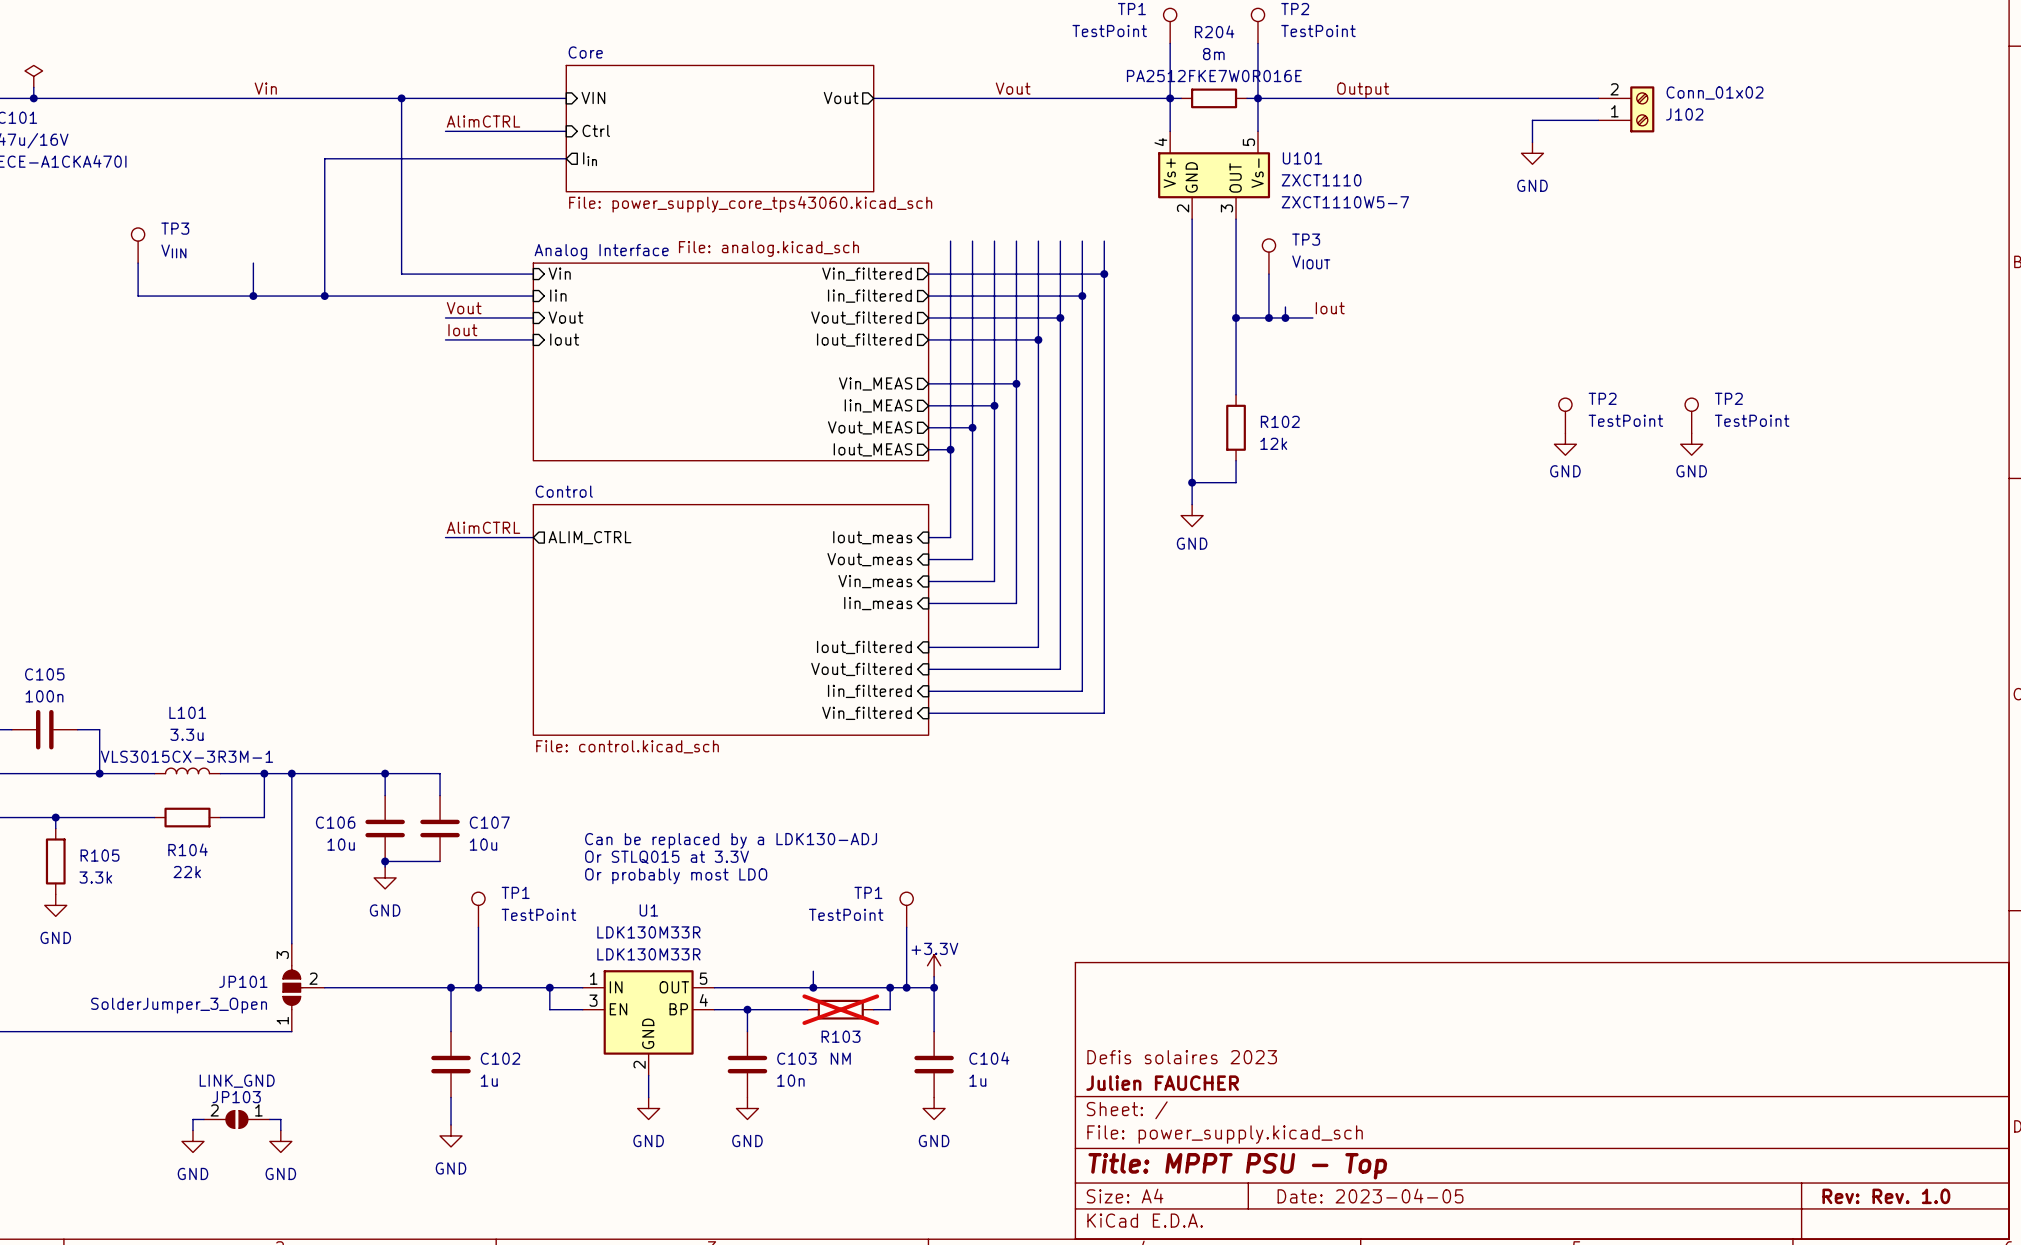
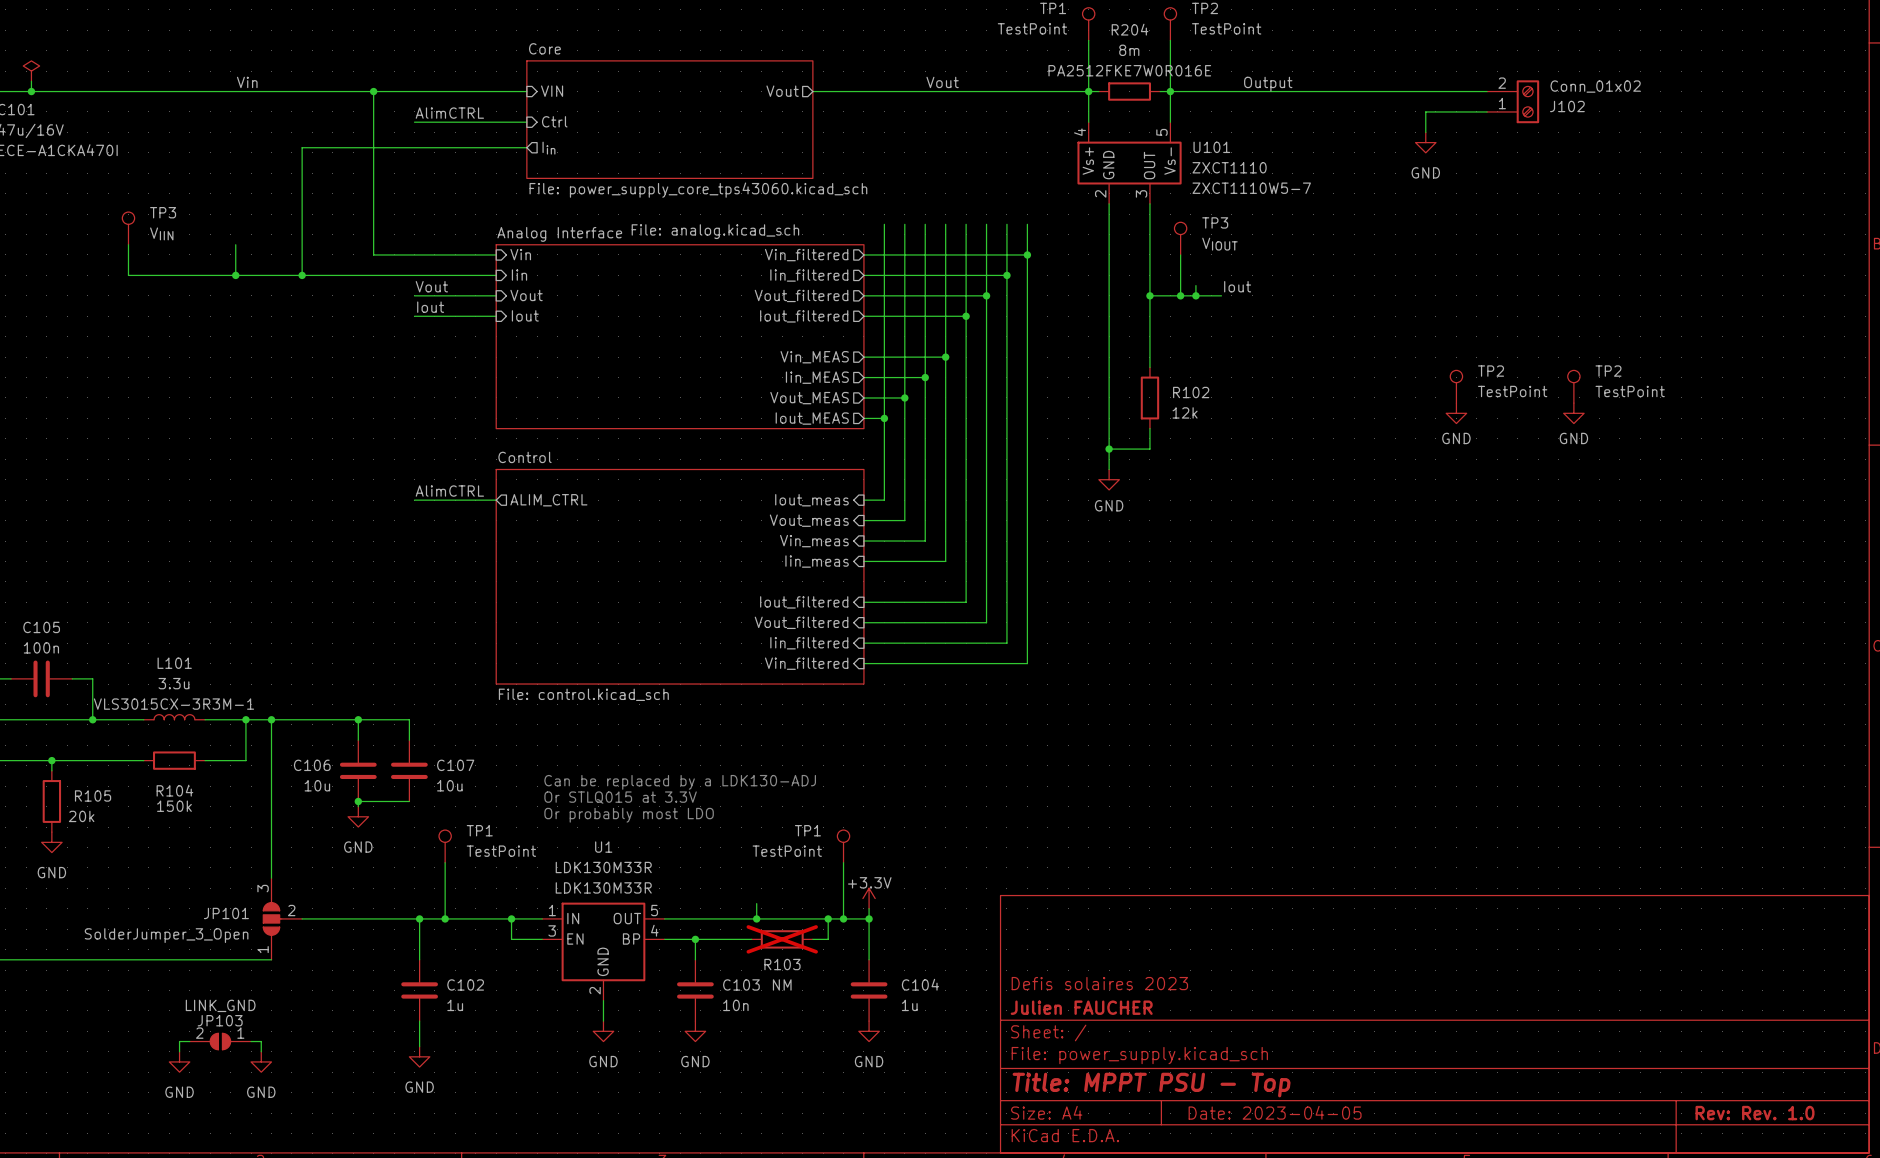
R104 value: 22k (187, 872) -> 150k (174, 806)
R105 value: 3.3k (95, 877) -> 20k (81, 816)

